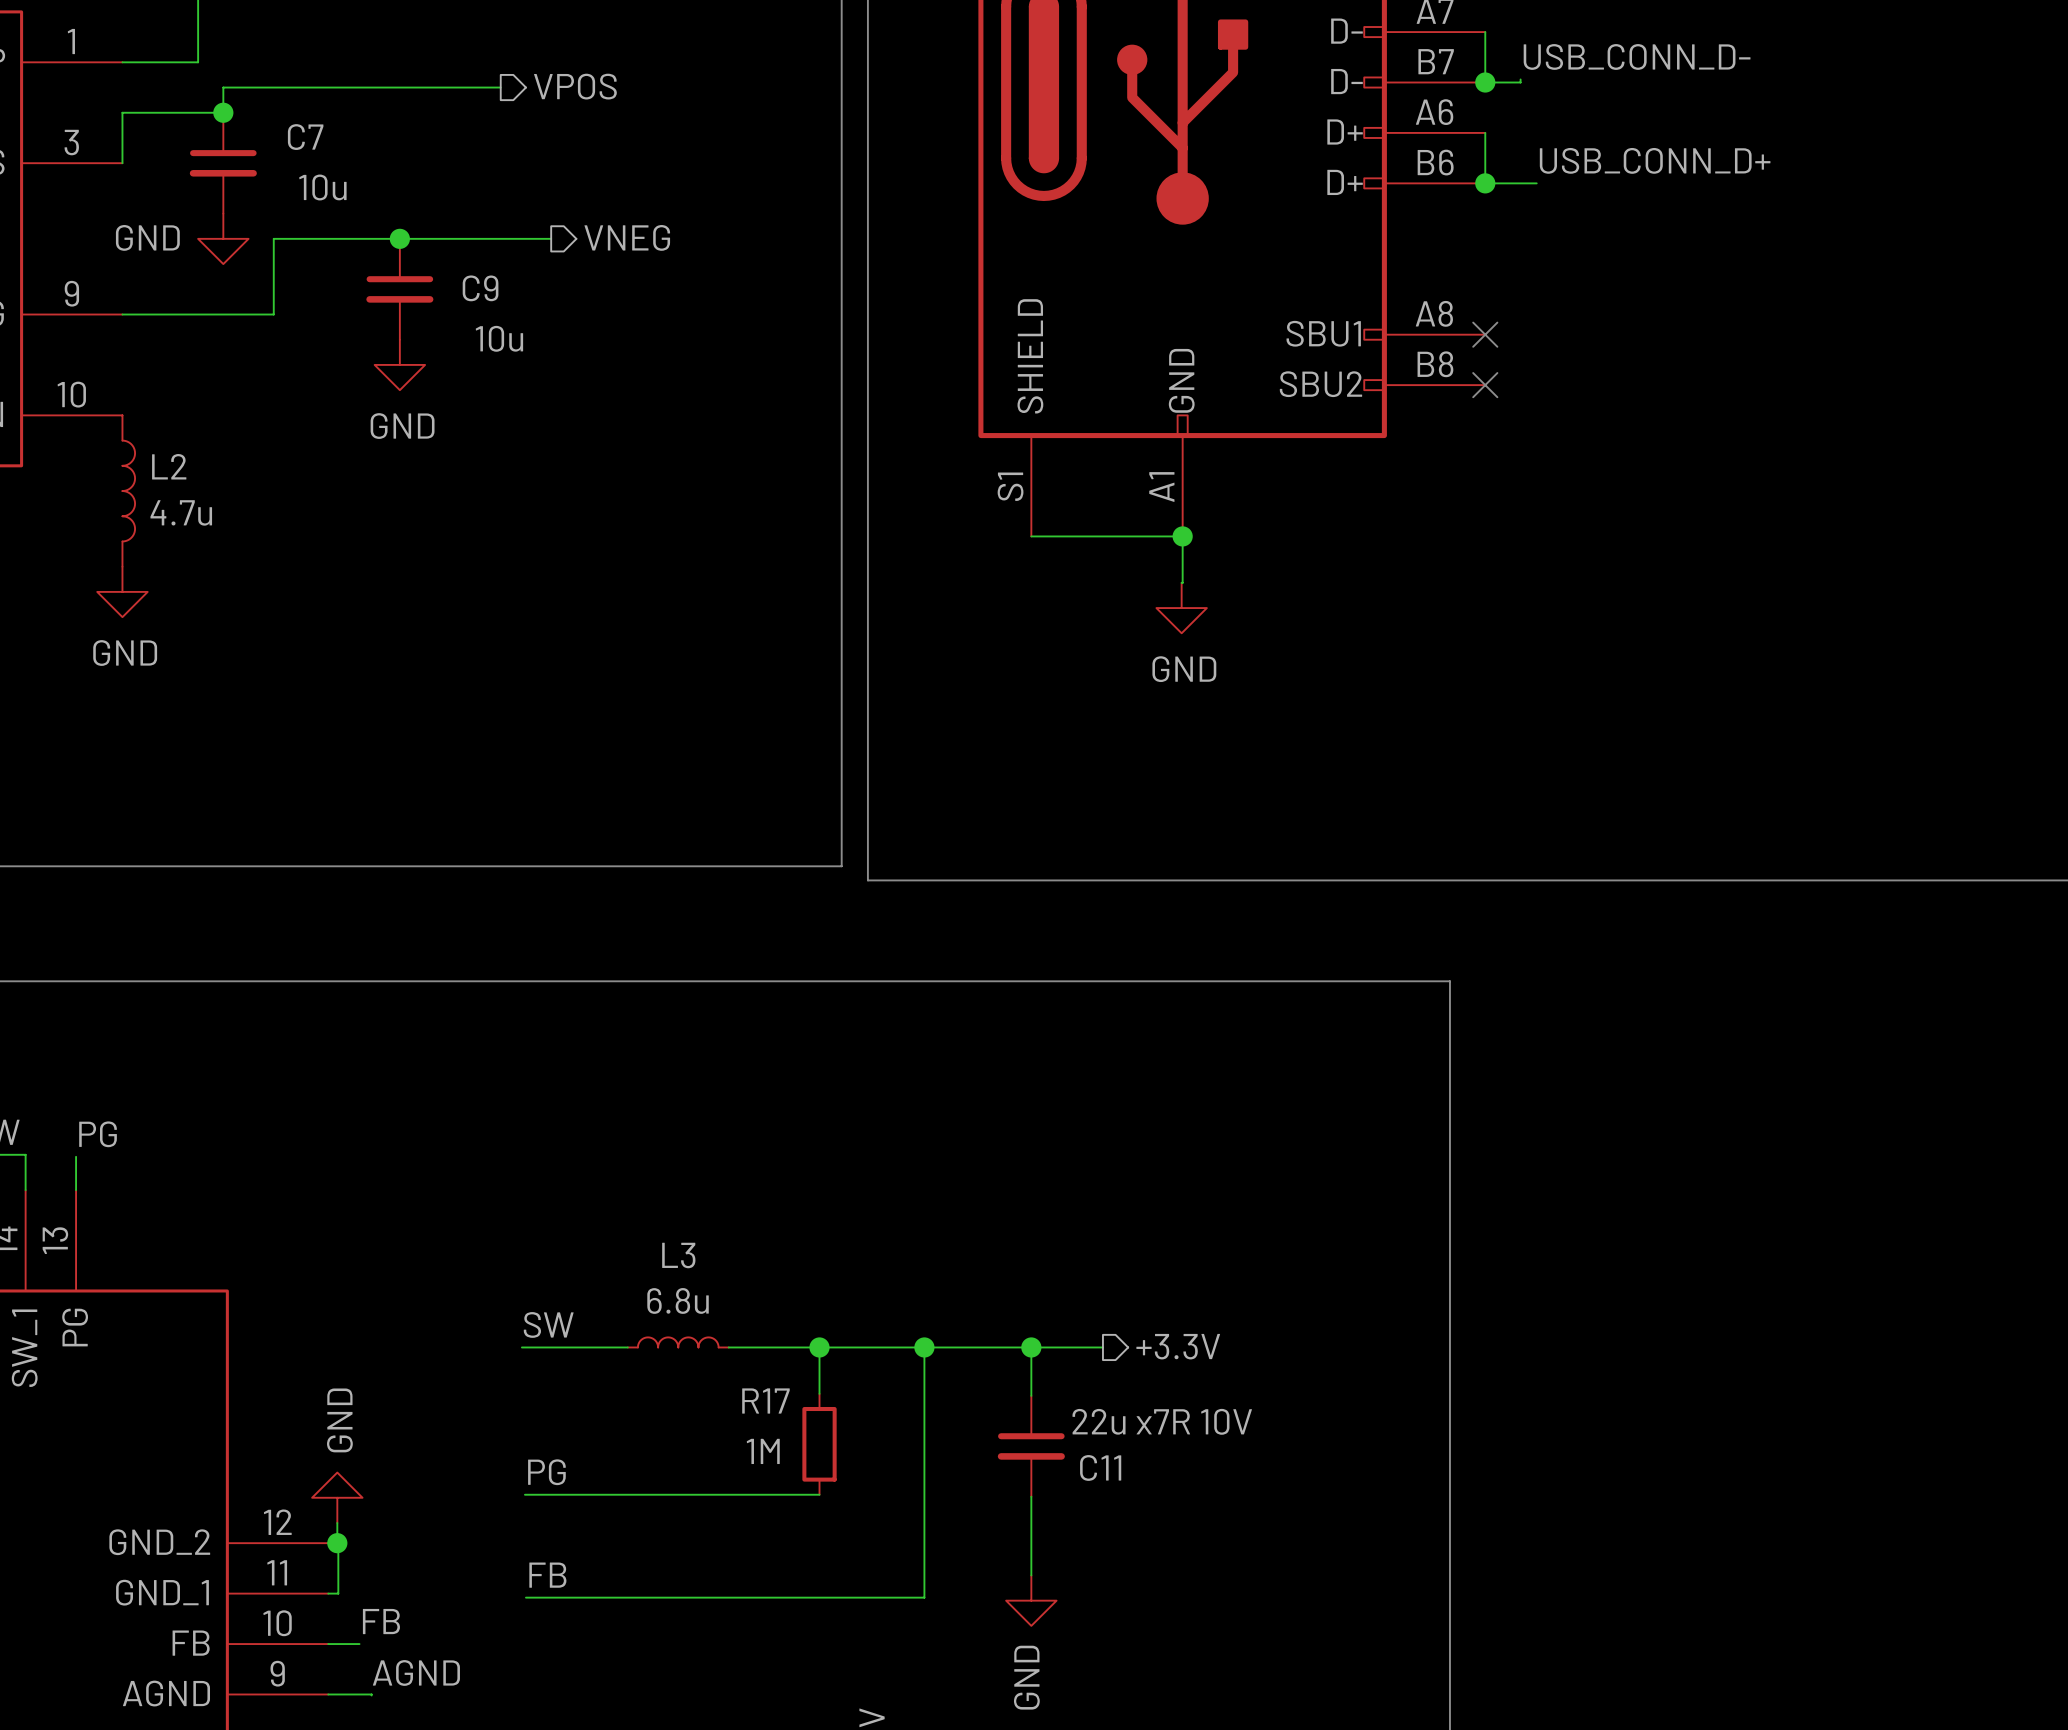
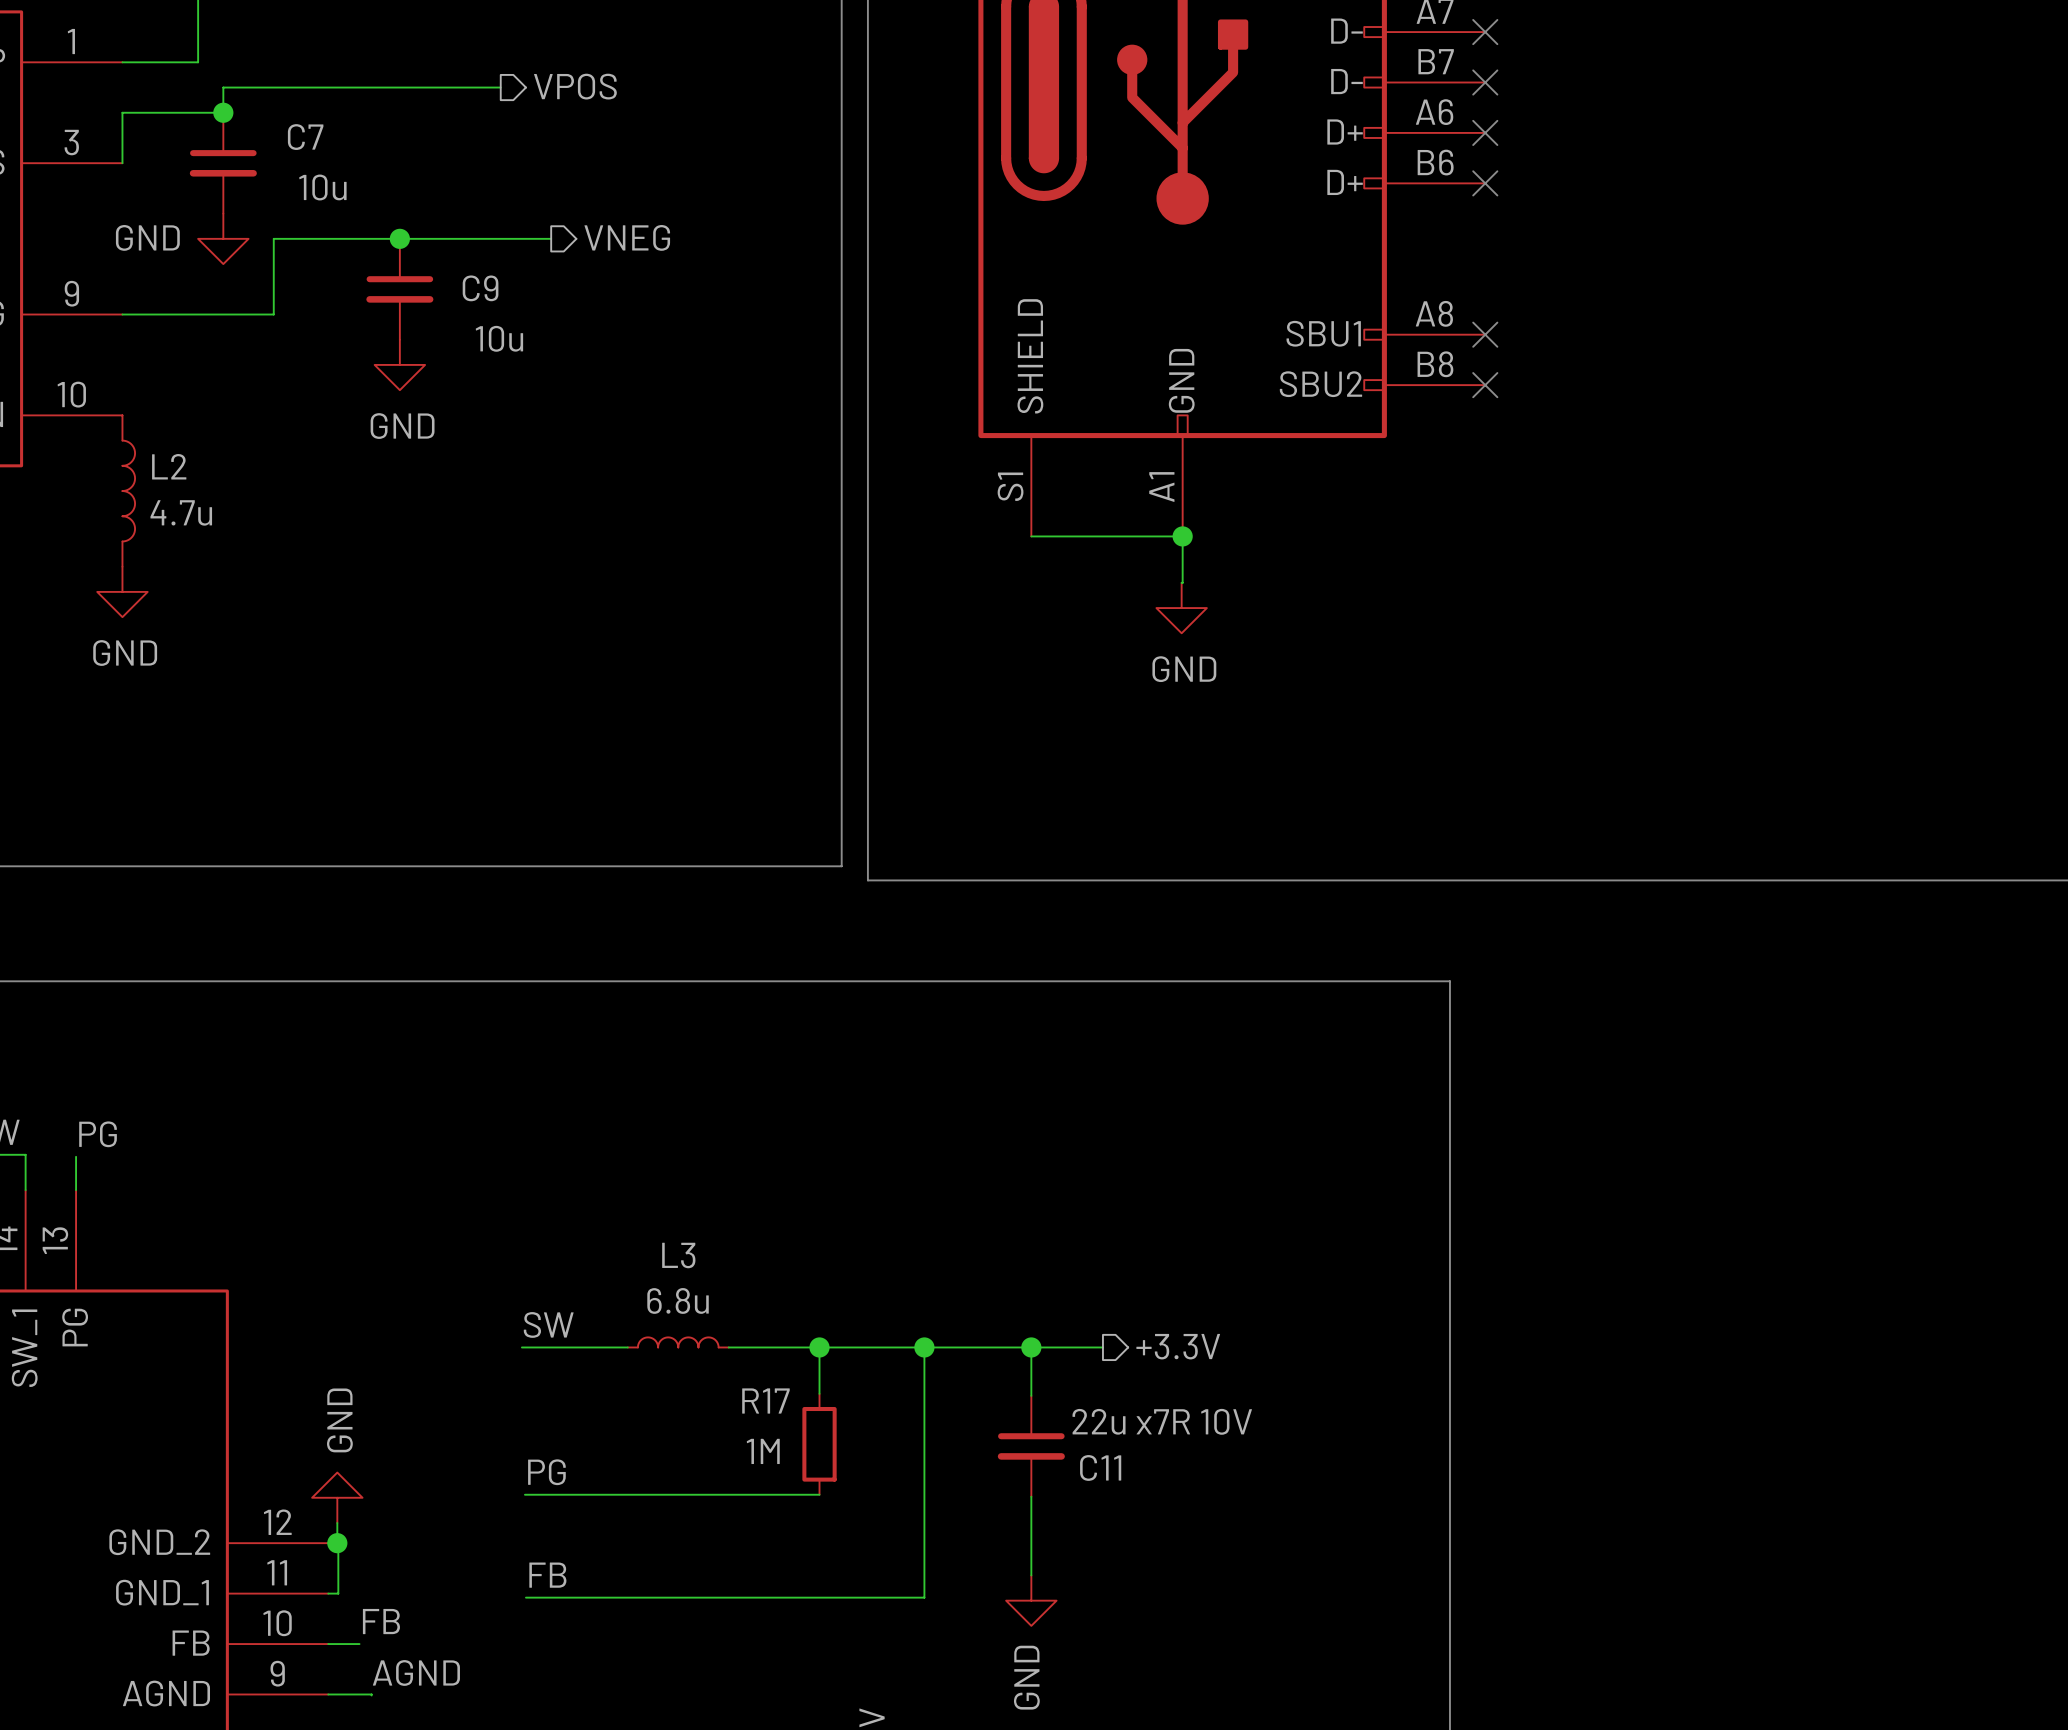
wire: (1485, 32) (1485, 82) (1520, 82) (1520, 79) -> none
no-connect mark: none -> (1485, 32)
label: USB_CONN_D- (1637, 56) -> none
junction: (1485, 82) -> none
no-connect mark: none -> (1485, 82)
wire: (1485, 132) (1485, 183) (1536, 183) -> none
no-connect mark: none -> (1485, 132)
label: USB_CONN_D+ (1655, 160) -> none
junction: (1485, 183) -> none
no-connect mark: none -> (1485, 183)

